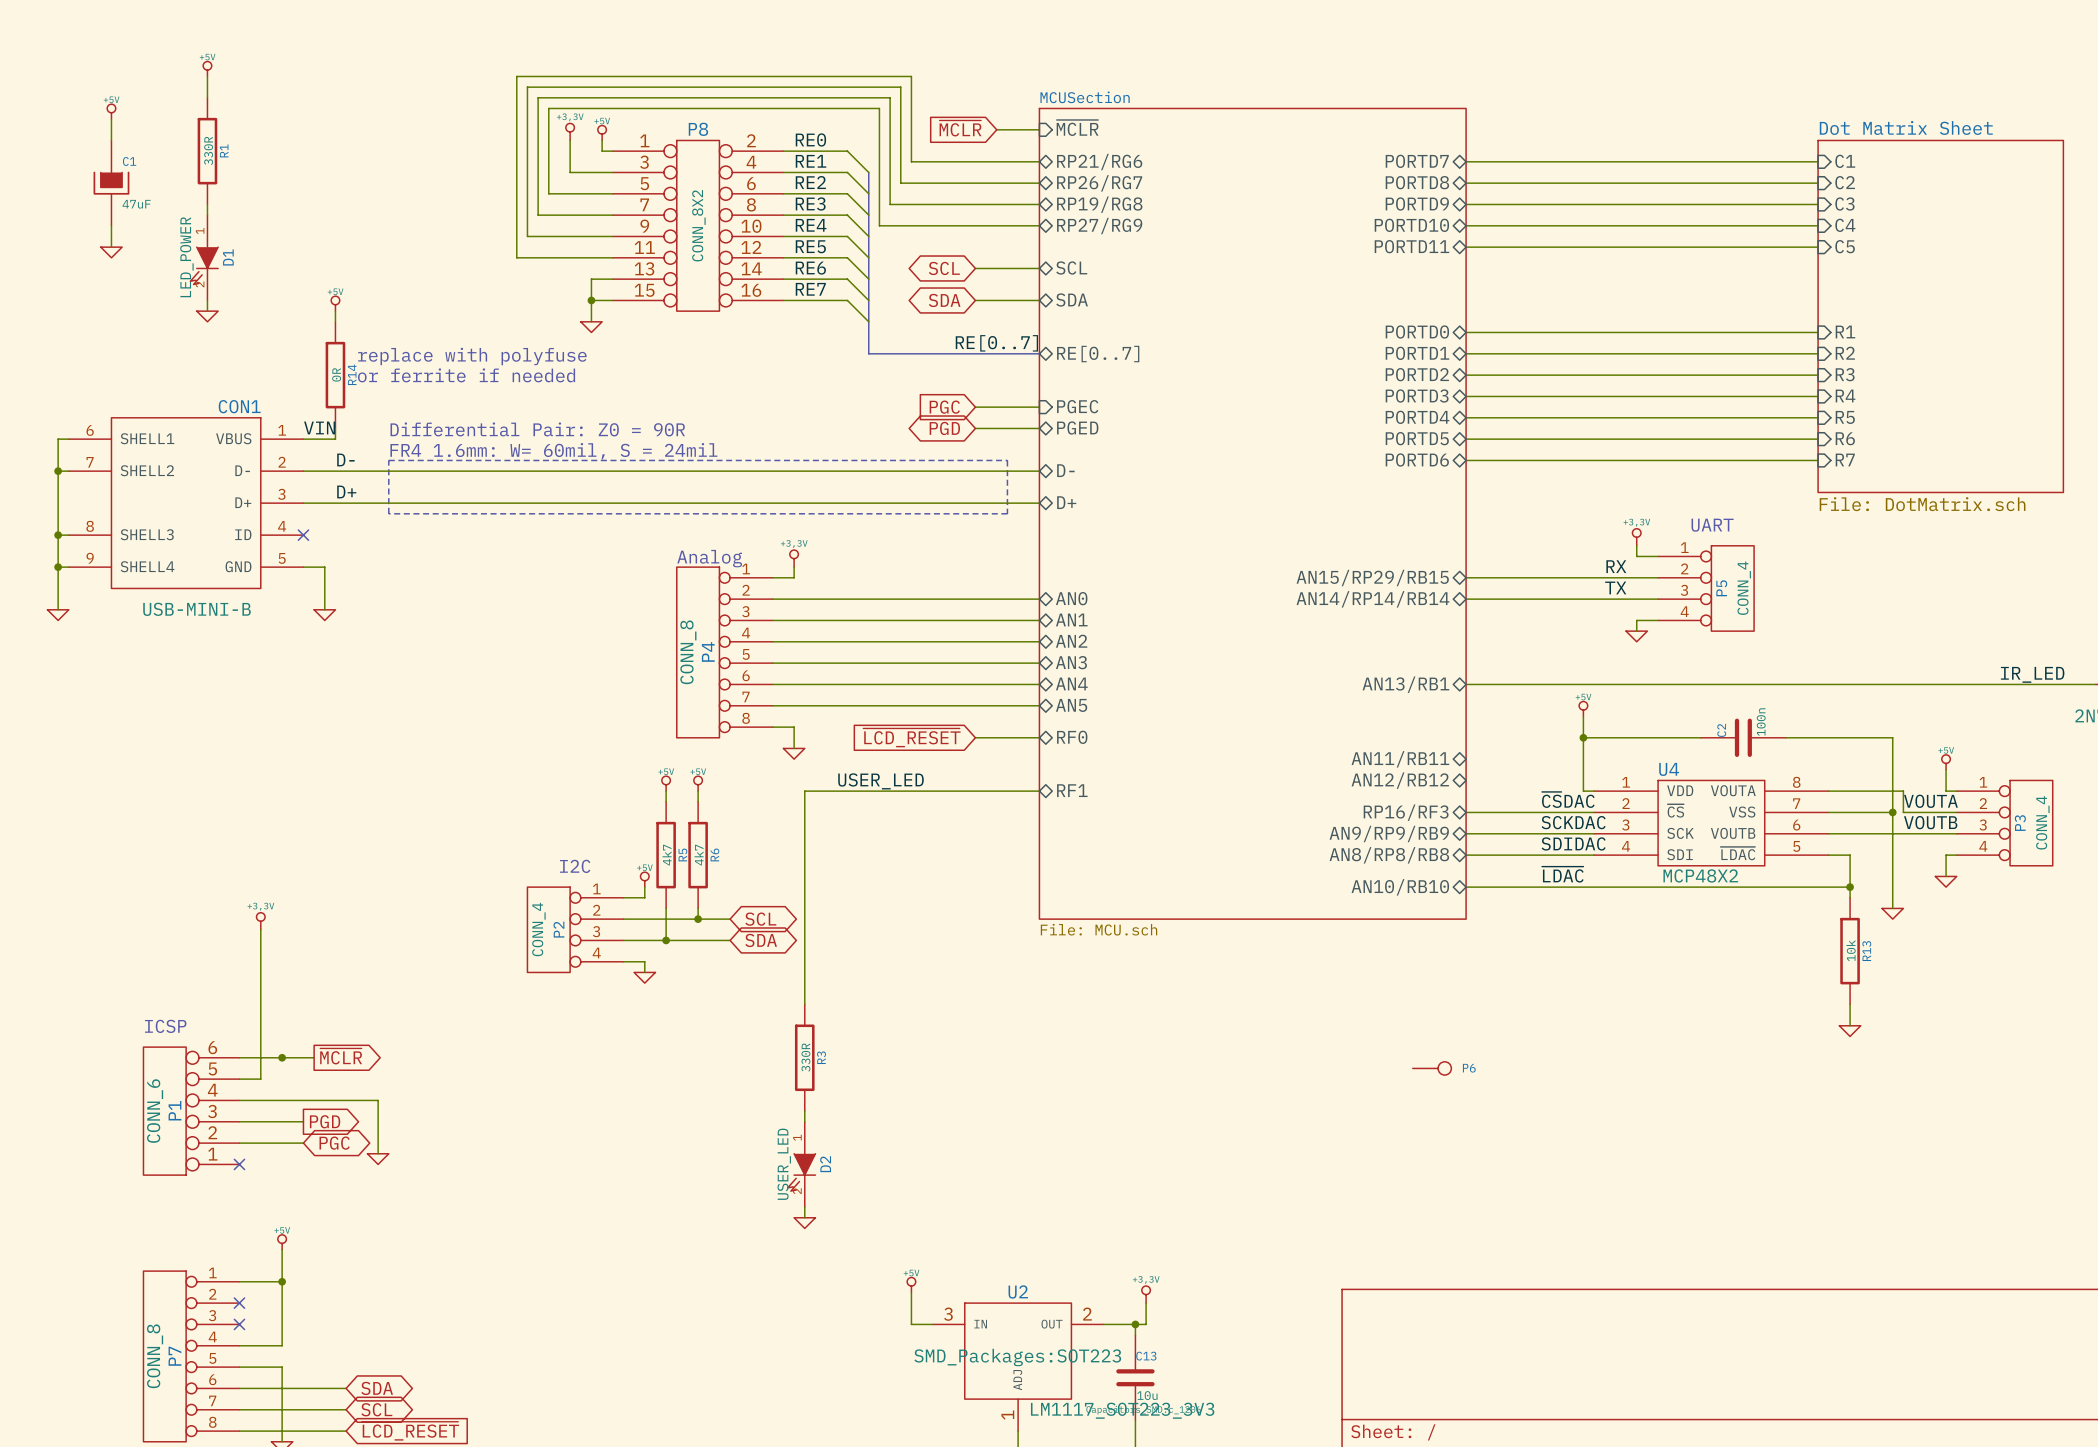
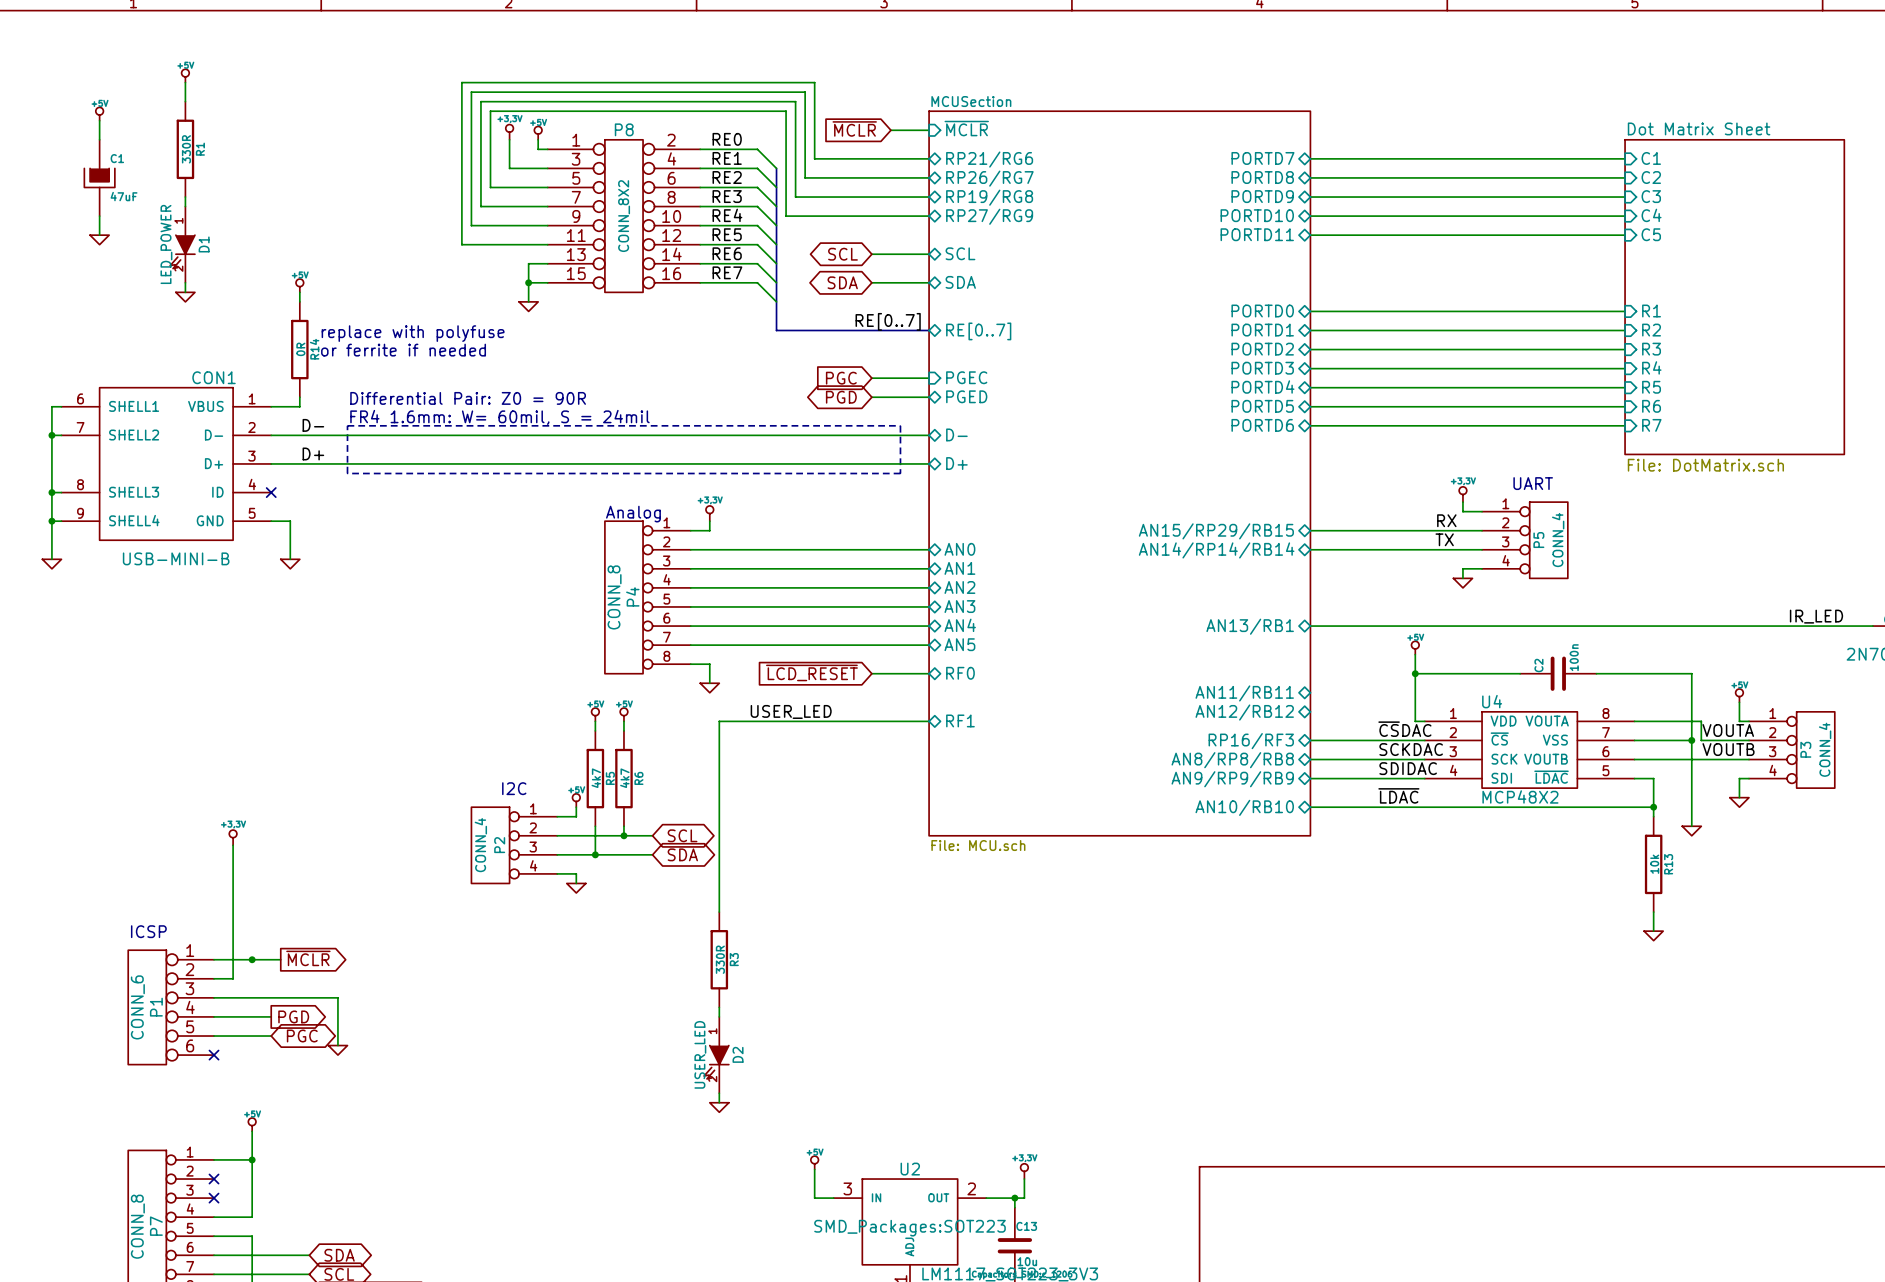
label: VIN (319, 427) -> none
sheet pin: AN9/RP9/RB9 (1389, 834) -> AN8/RP8/RB8 (1232, 760)
sheet pin: AN8/RP8/RB8 (1389, 855) -> AN9/RP9/RB9 (1232, 779)
P6: (1432, 1068) -> none
P1 flip: as is (164, 1111) -> up-down (147, 1007)

